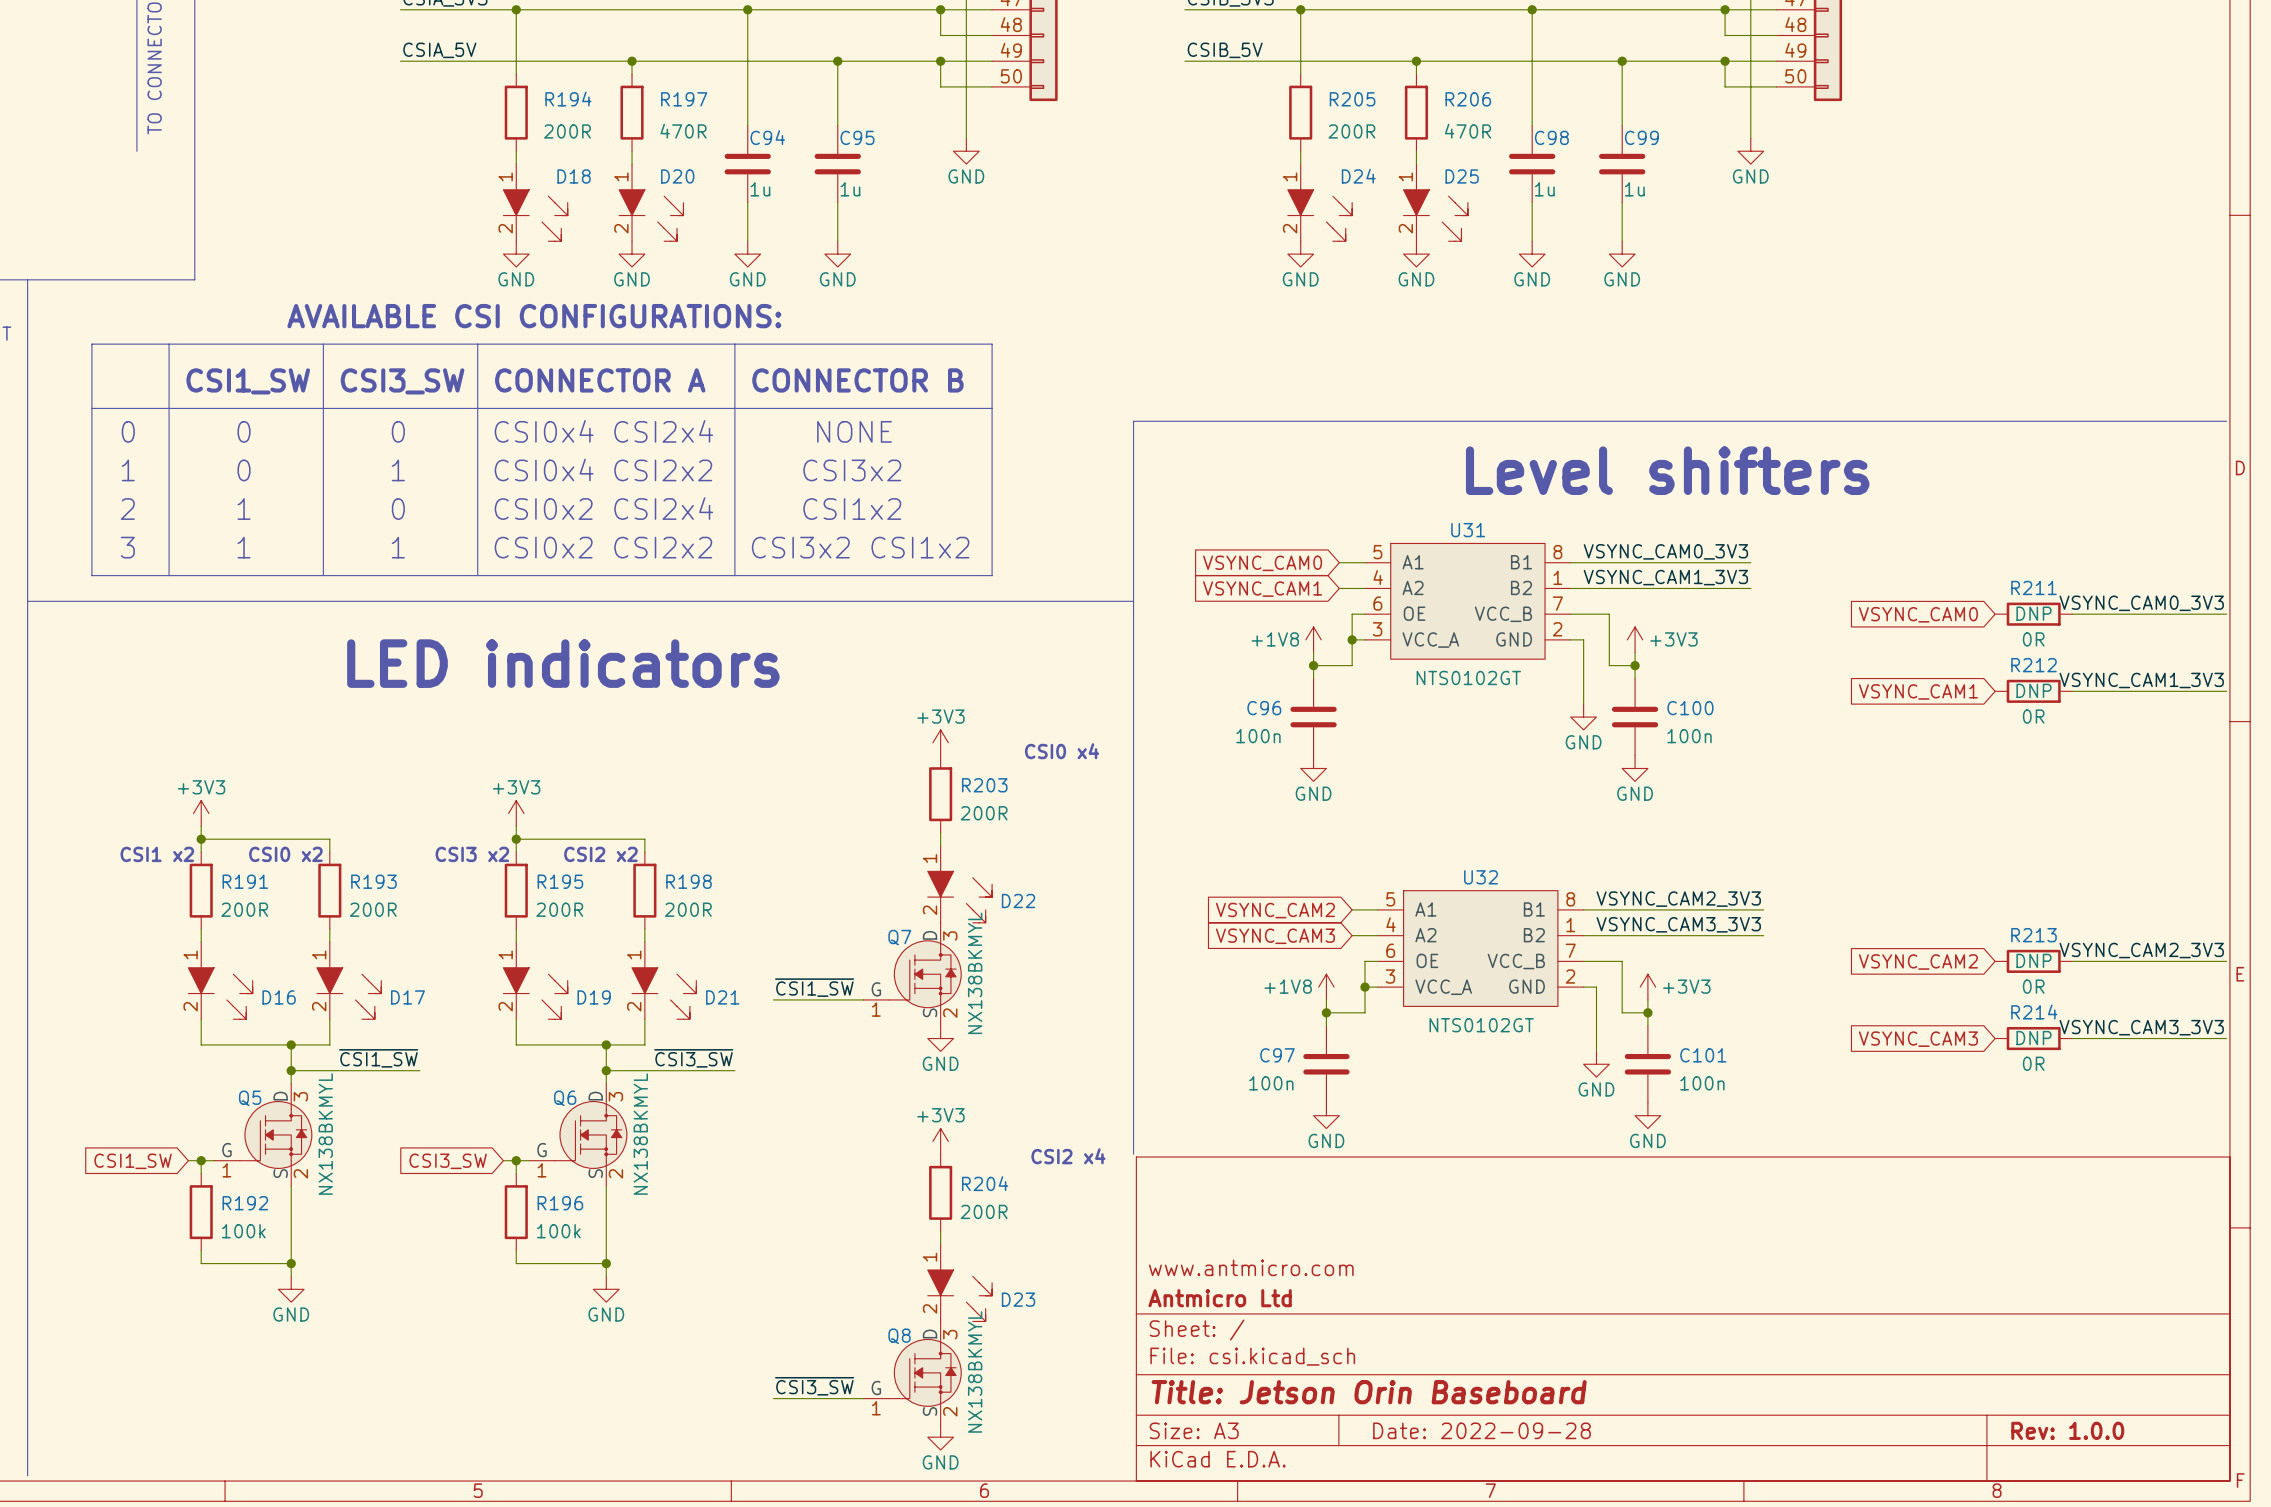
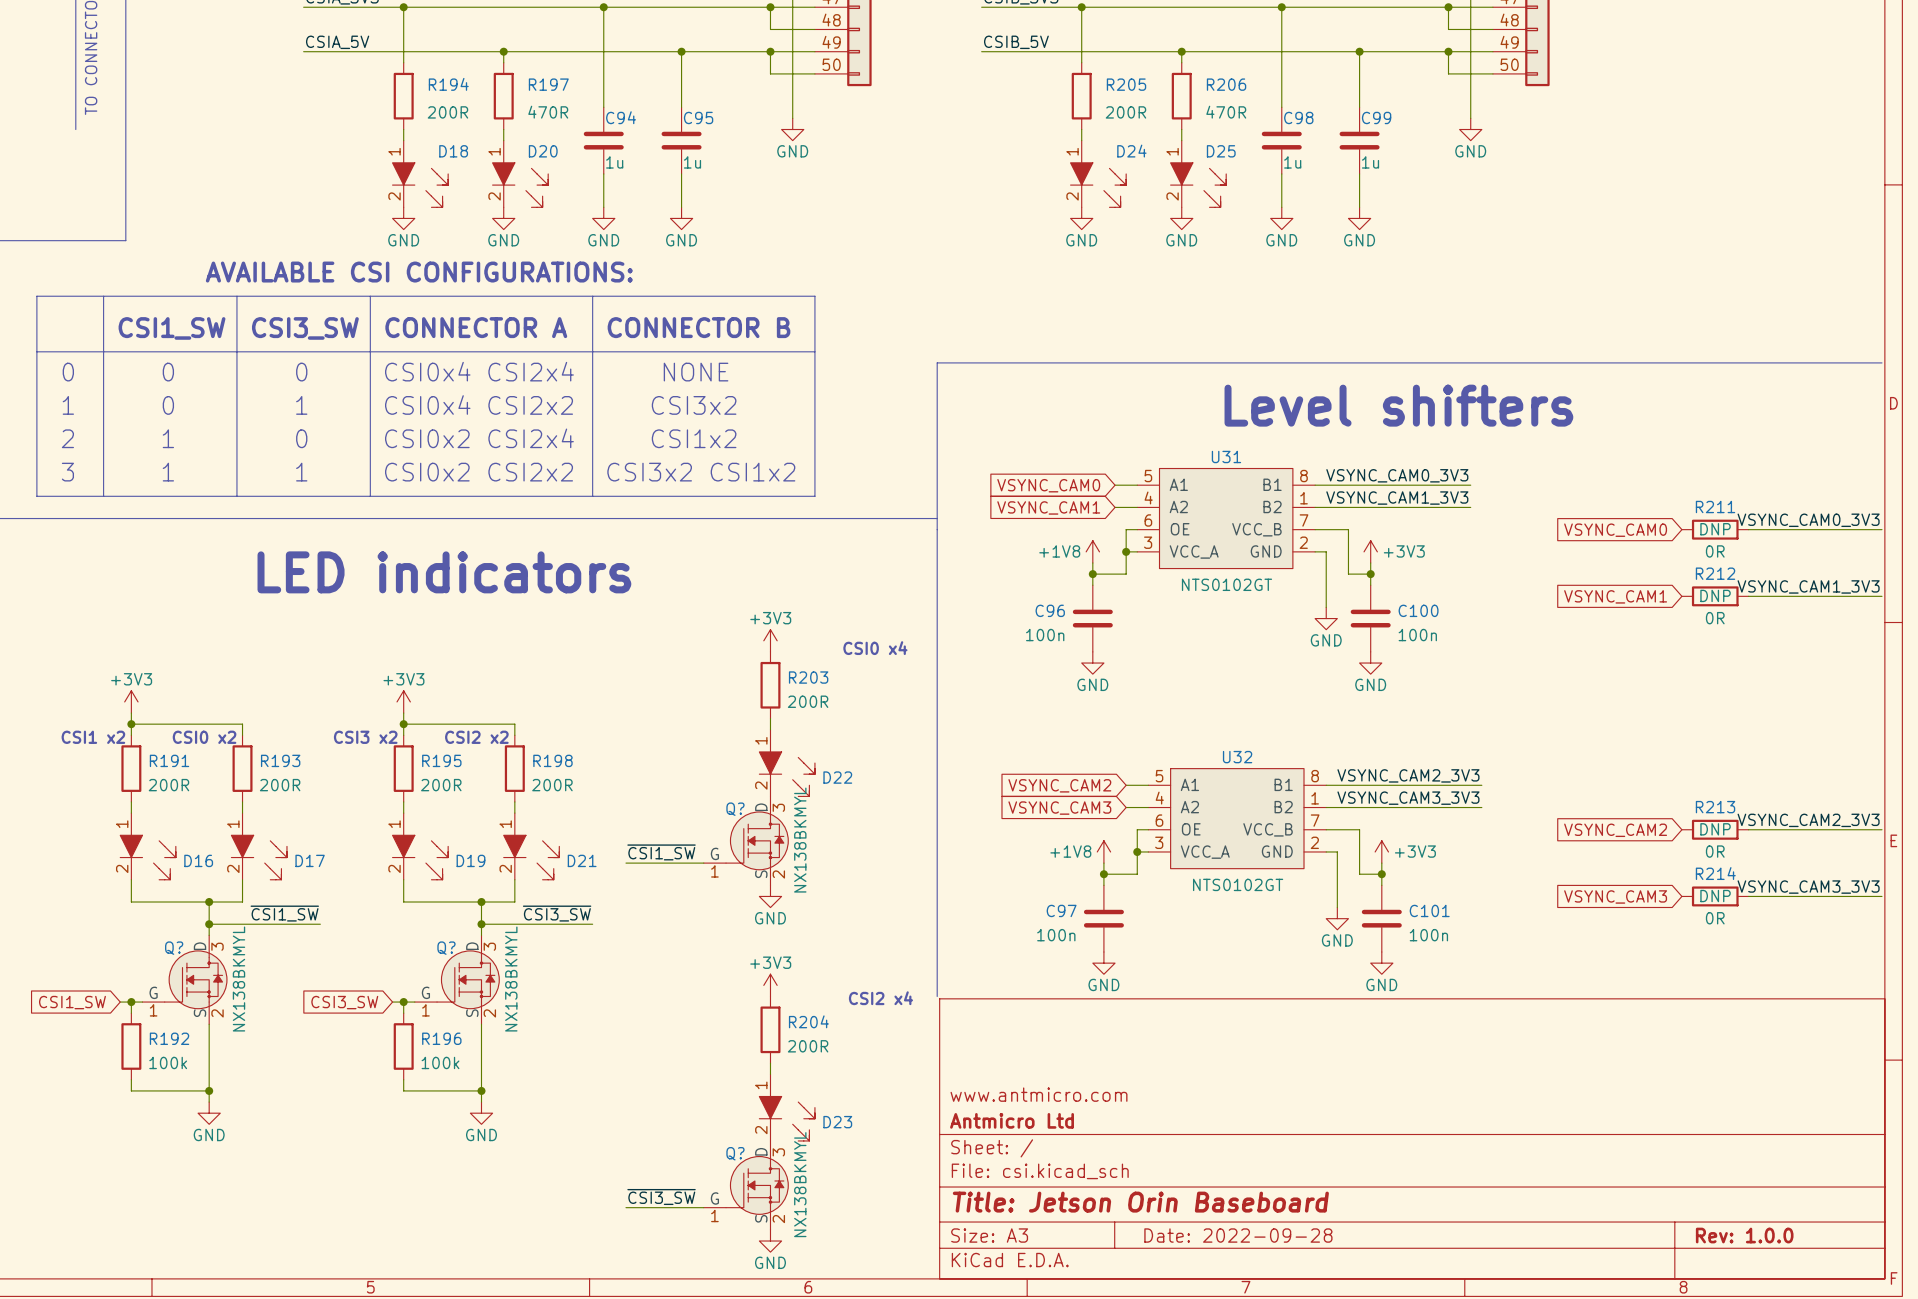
Q7 name: Q7 (899, 937) -> Q? (735, 809)
Q5 name: Q5 (250, 1098) -> Q? (174, 948)
Q6 name: Q6 (565, 1098) -> Q? (446, 948)
Q8 name: Q8 (899, 1336) -> Q? (735, 1153)

